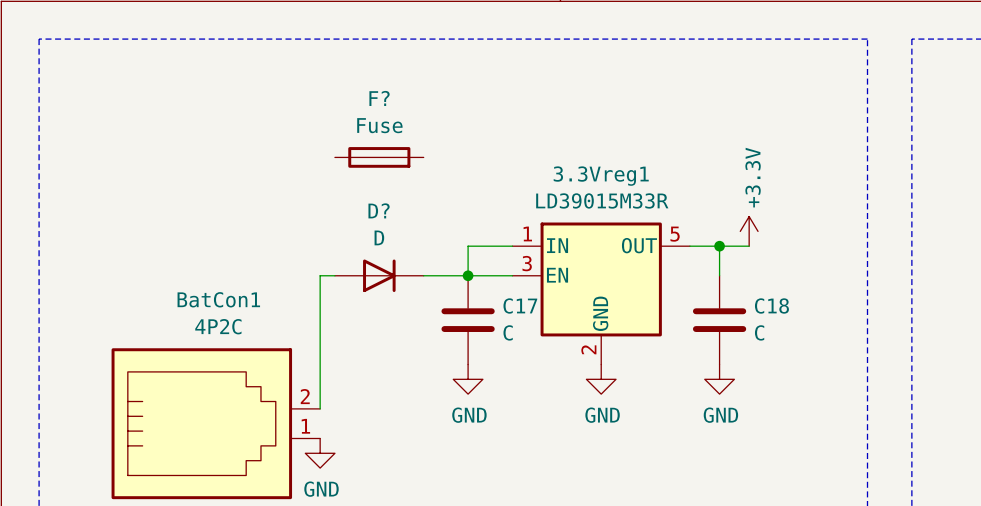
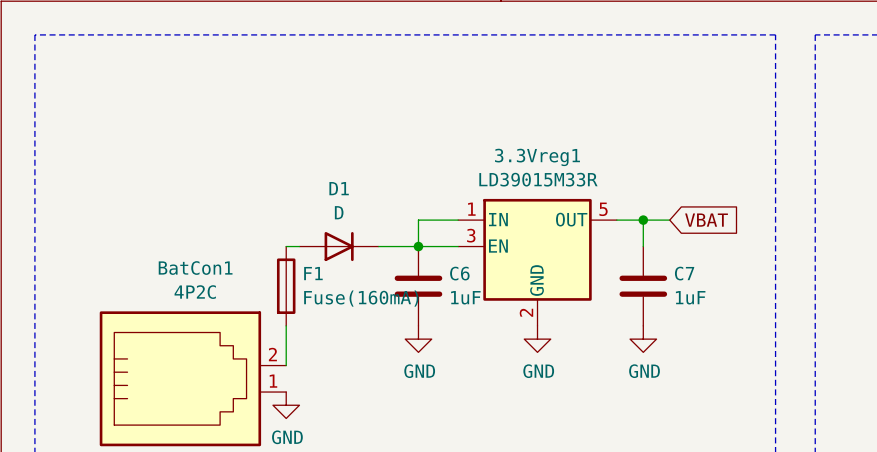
F?: Fuse (379, 157) -> none
D? name: D? (379, 210) -> D1 (339, 188)
power symbol: +3.3V (749, 231) -> none
global label: none -> VBAT (706, 220)
C17 name: C17 (520, 306) -> C6 (459, 273)
C18 name: C18 (771, 306) -> C7 (684, 273)
F1: none -> Fuse(160mA) (286, 286)
C17 value: C (508, 332) -> 1uF (465, 297)
C18 value: C (759, 332) -> 1uF (690, 297)

